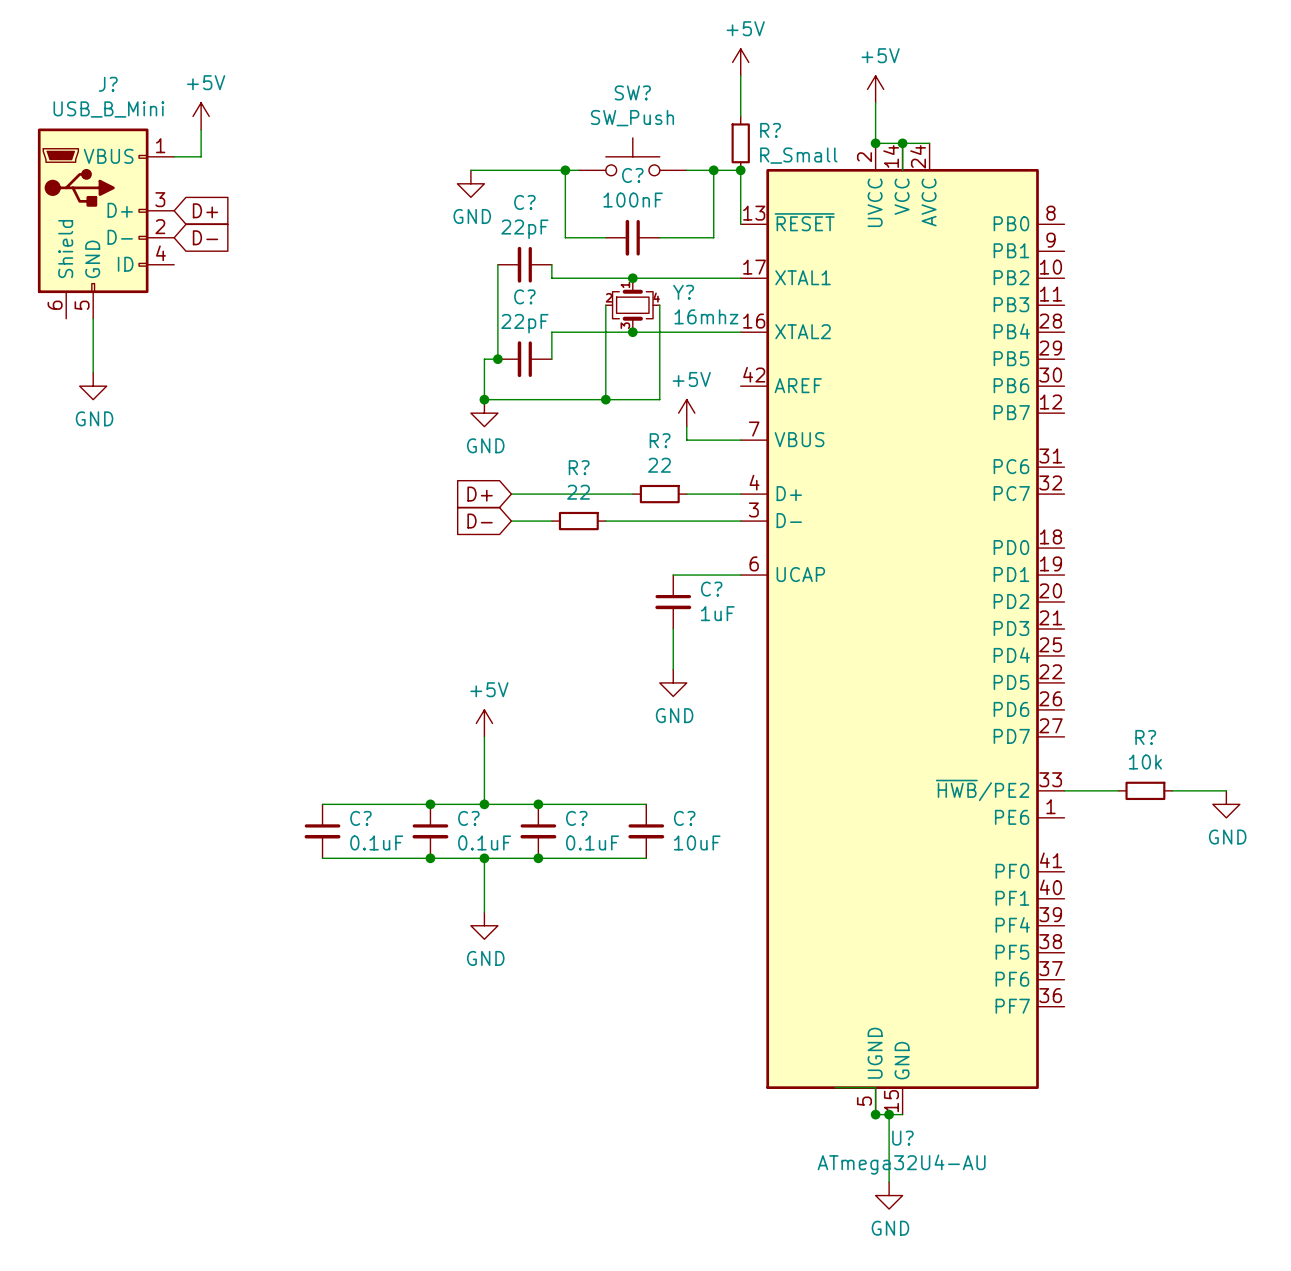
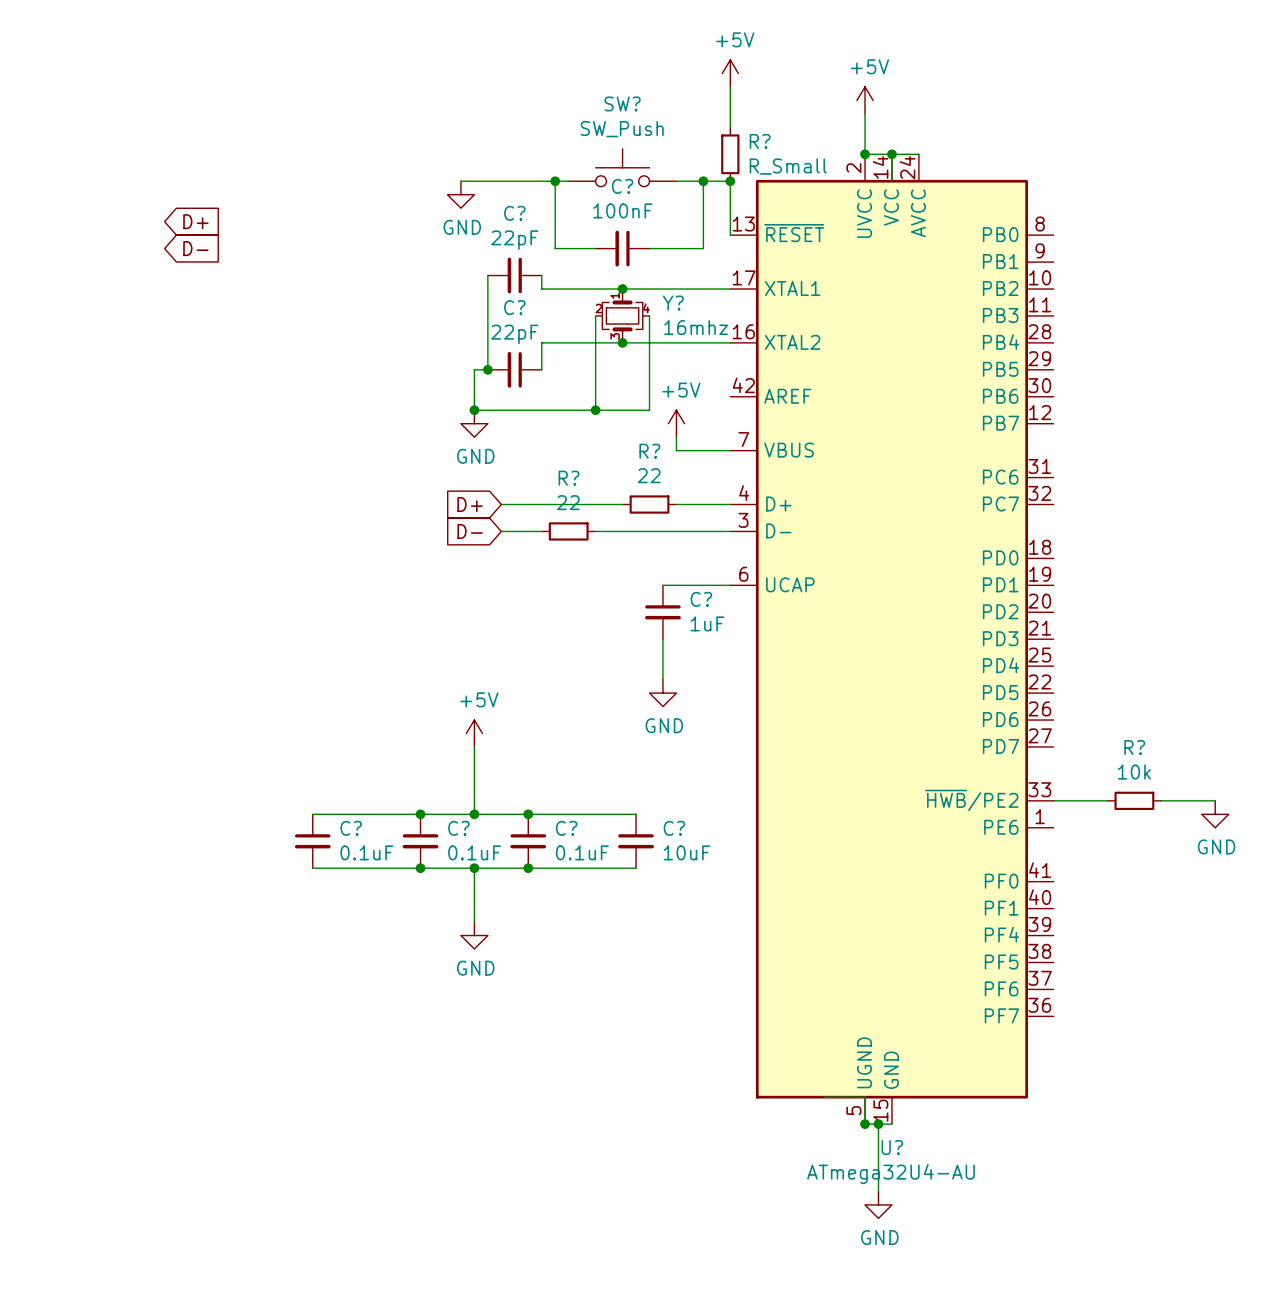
power symbol: +5V (201, 116) -> none
wire: (201, 129) (201, 156) (174, 156) -> none
J?: USB_B_Mini (106, 223) -> none
wire: (93, 318) (93, 372) -> none
power symbol: GND (93, 386) -> none

